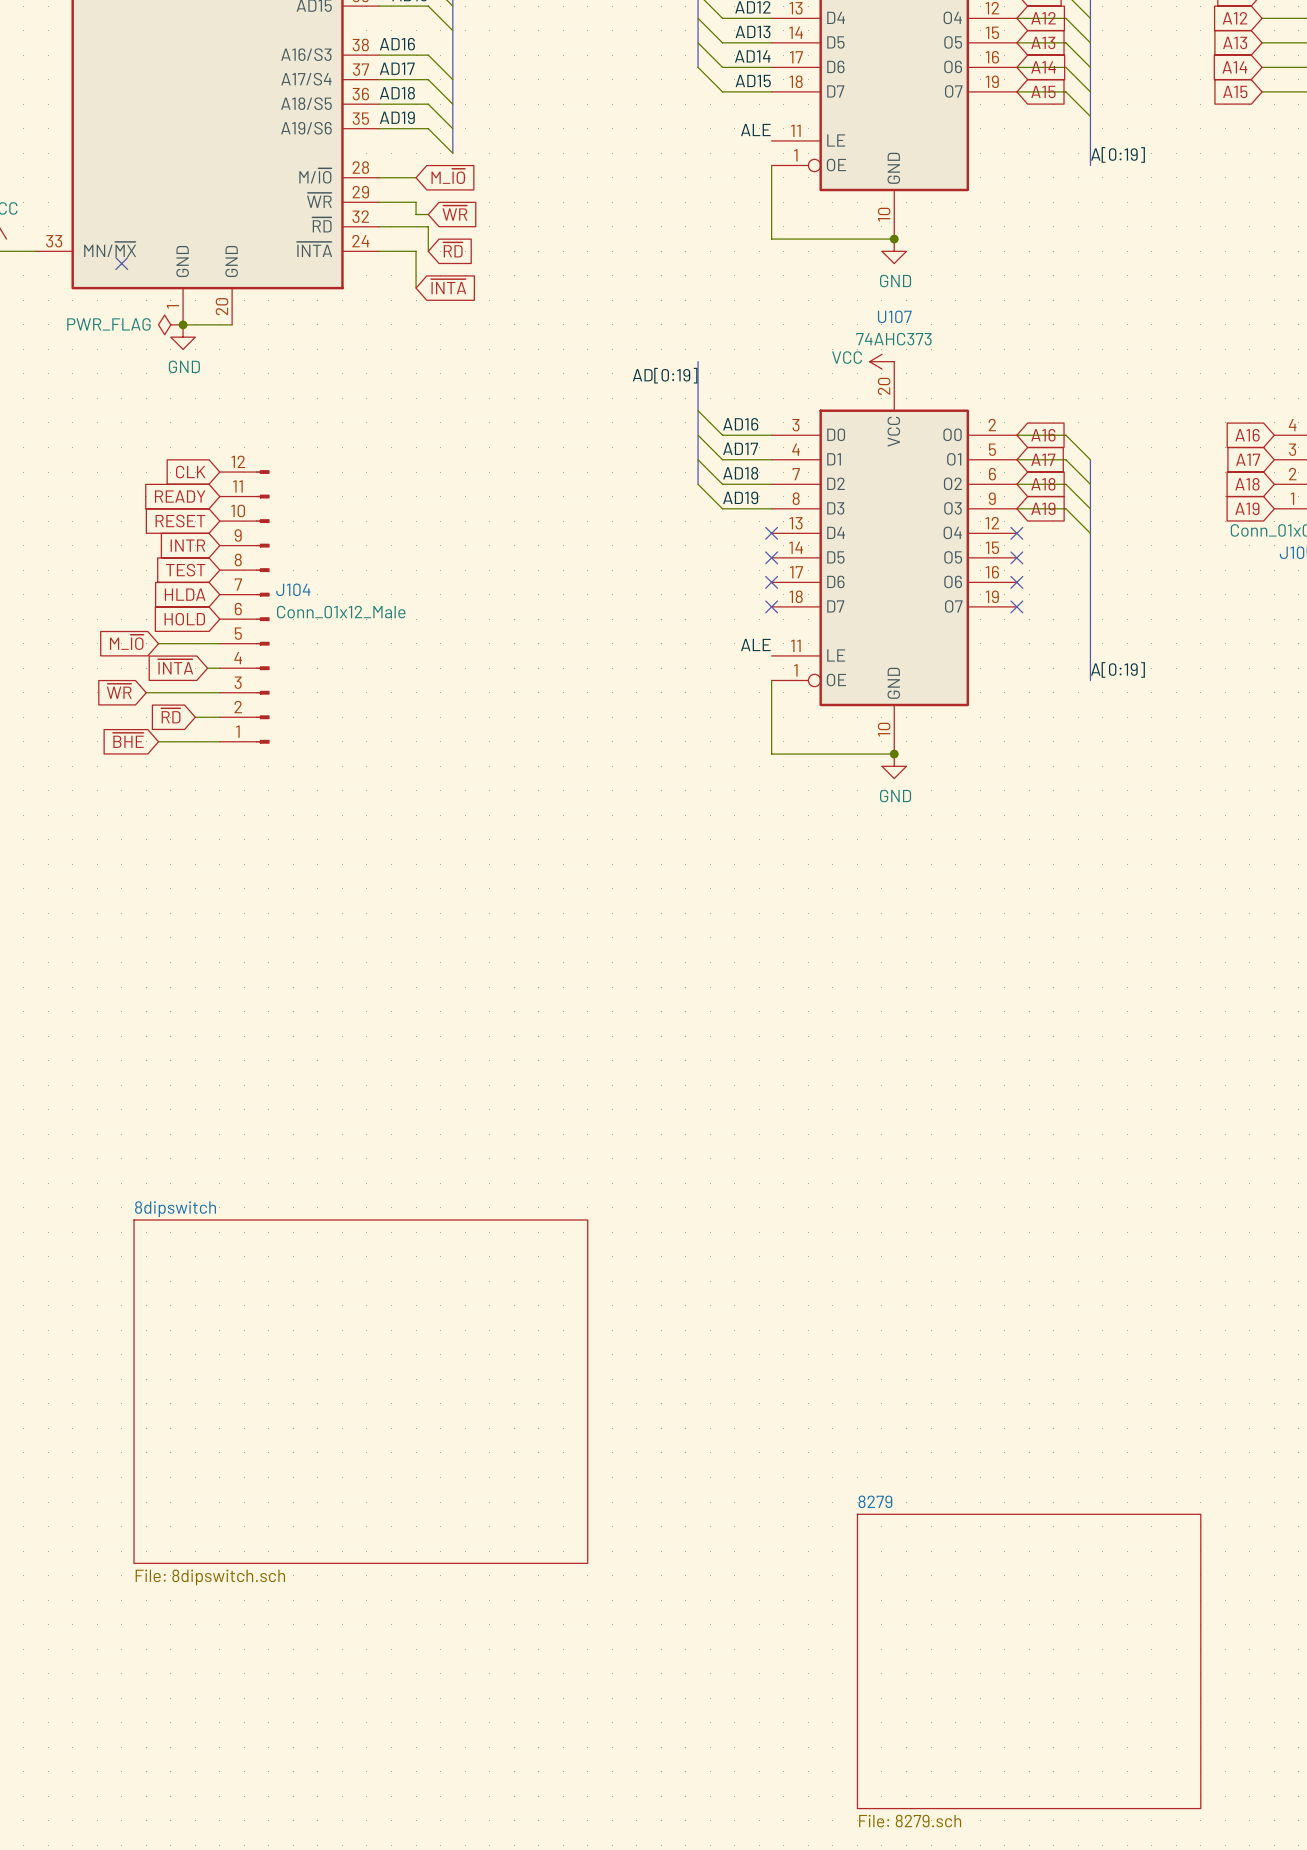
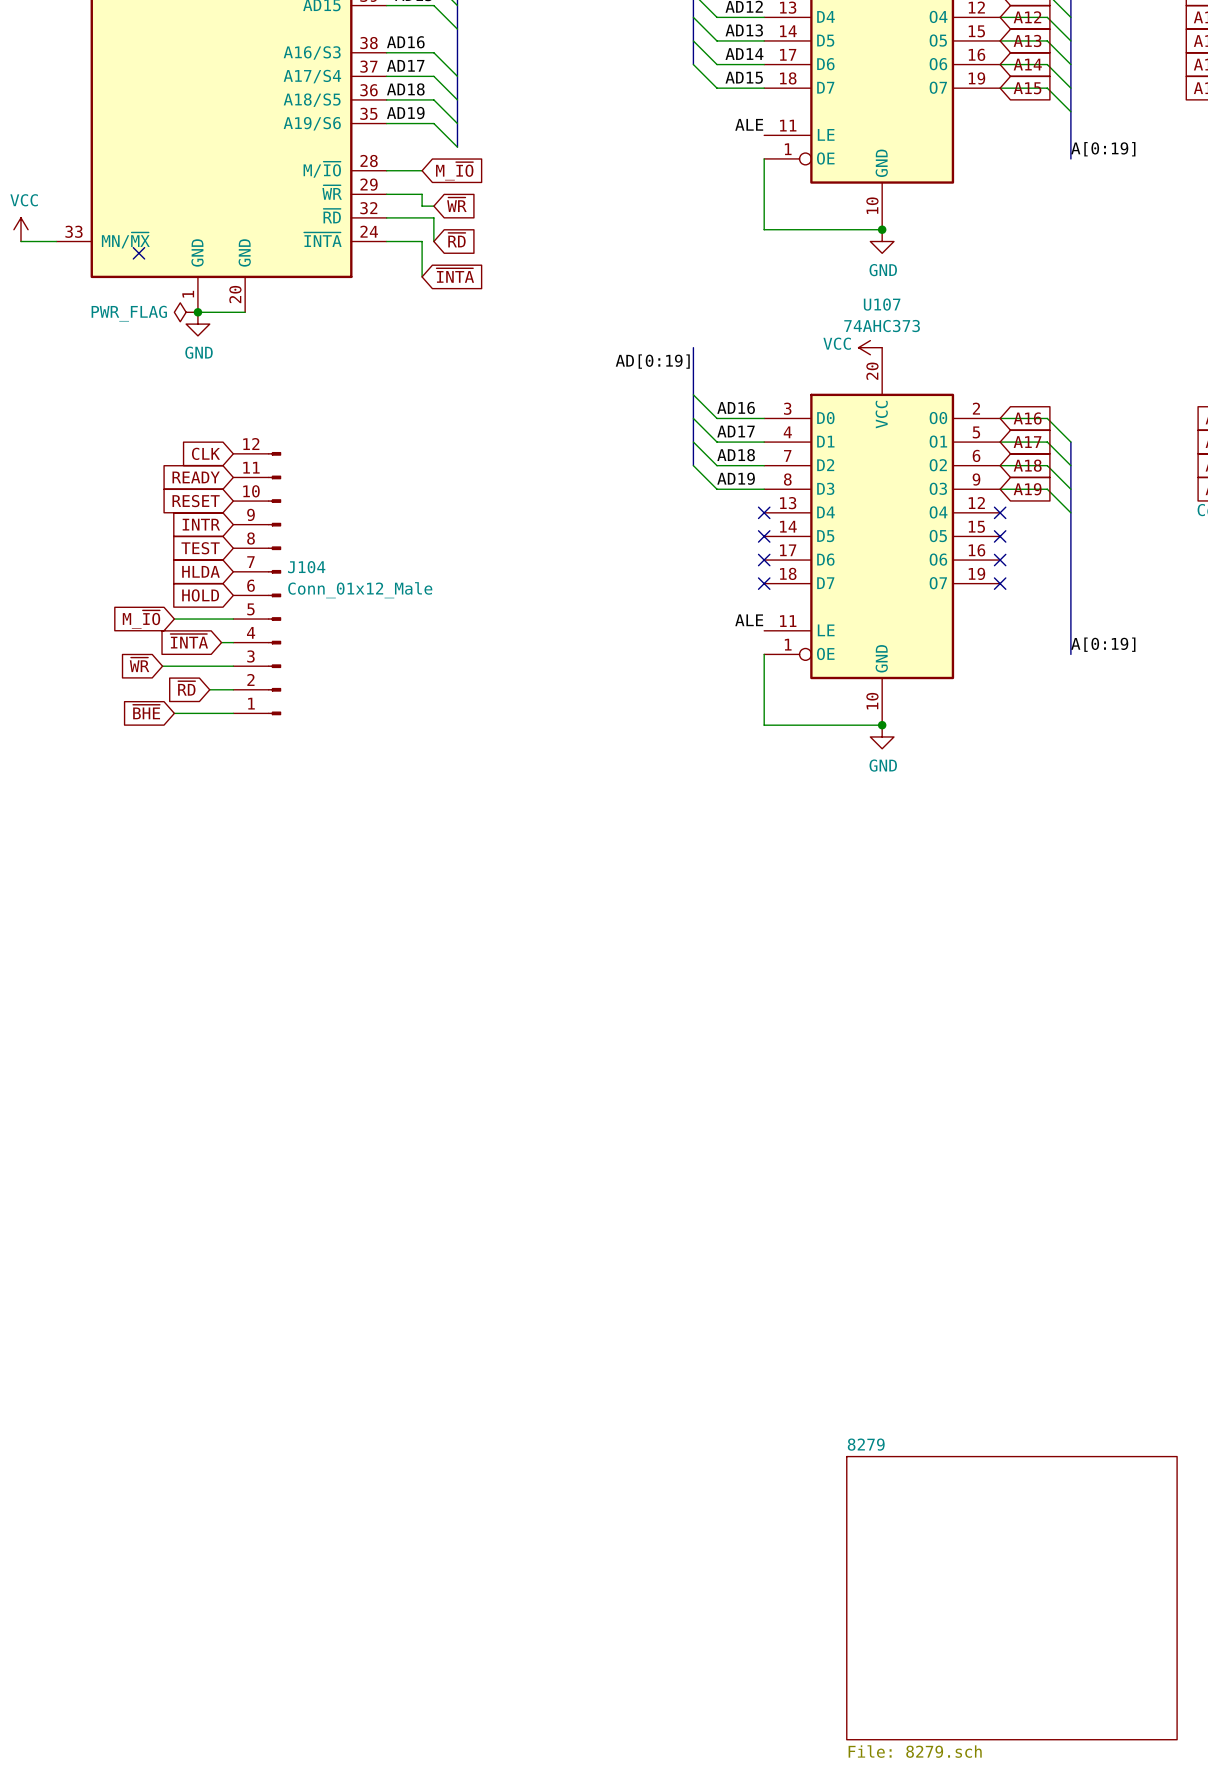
sheet 8dipswitch: File: 8dipswitch.sch (360, 1391) -> none

